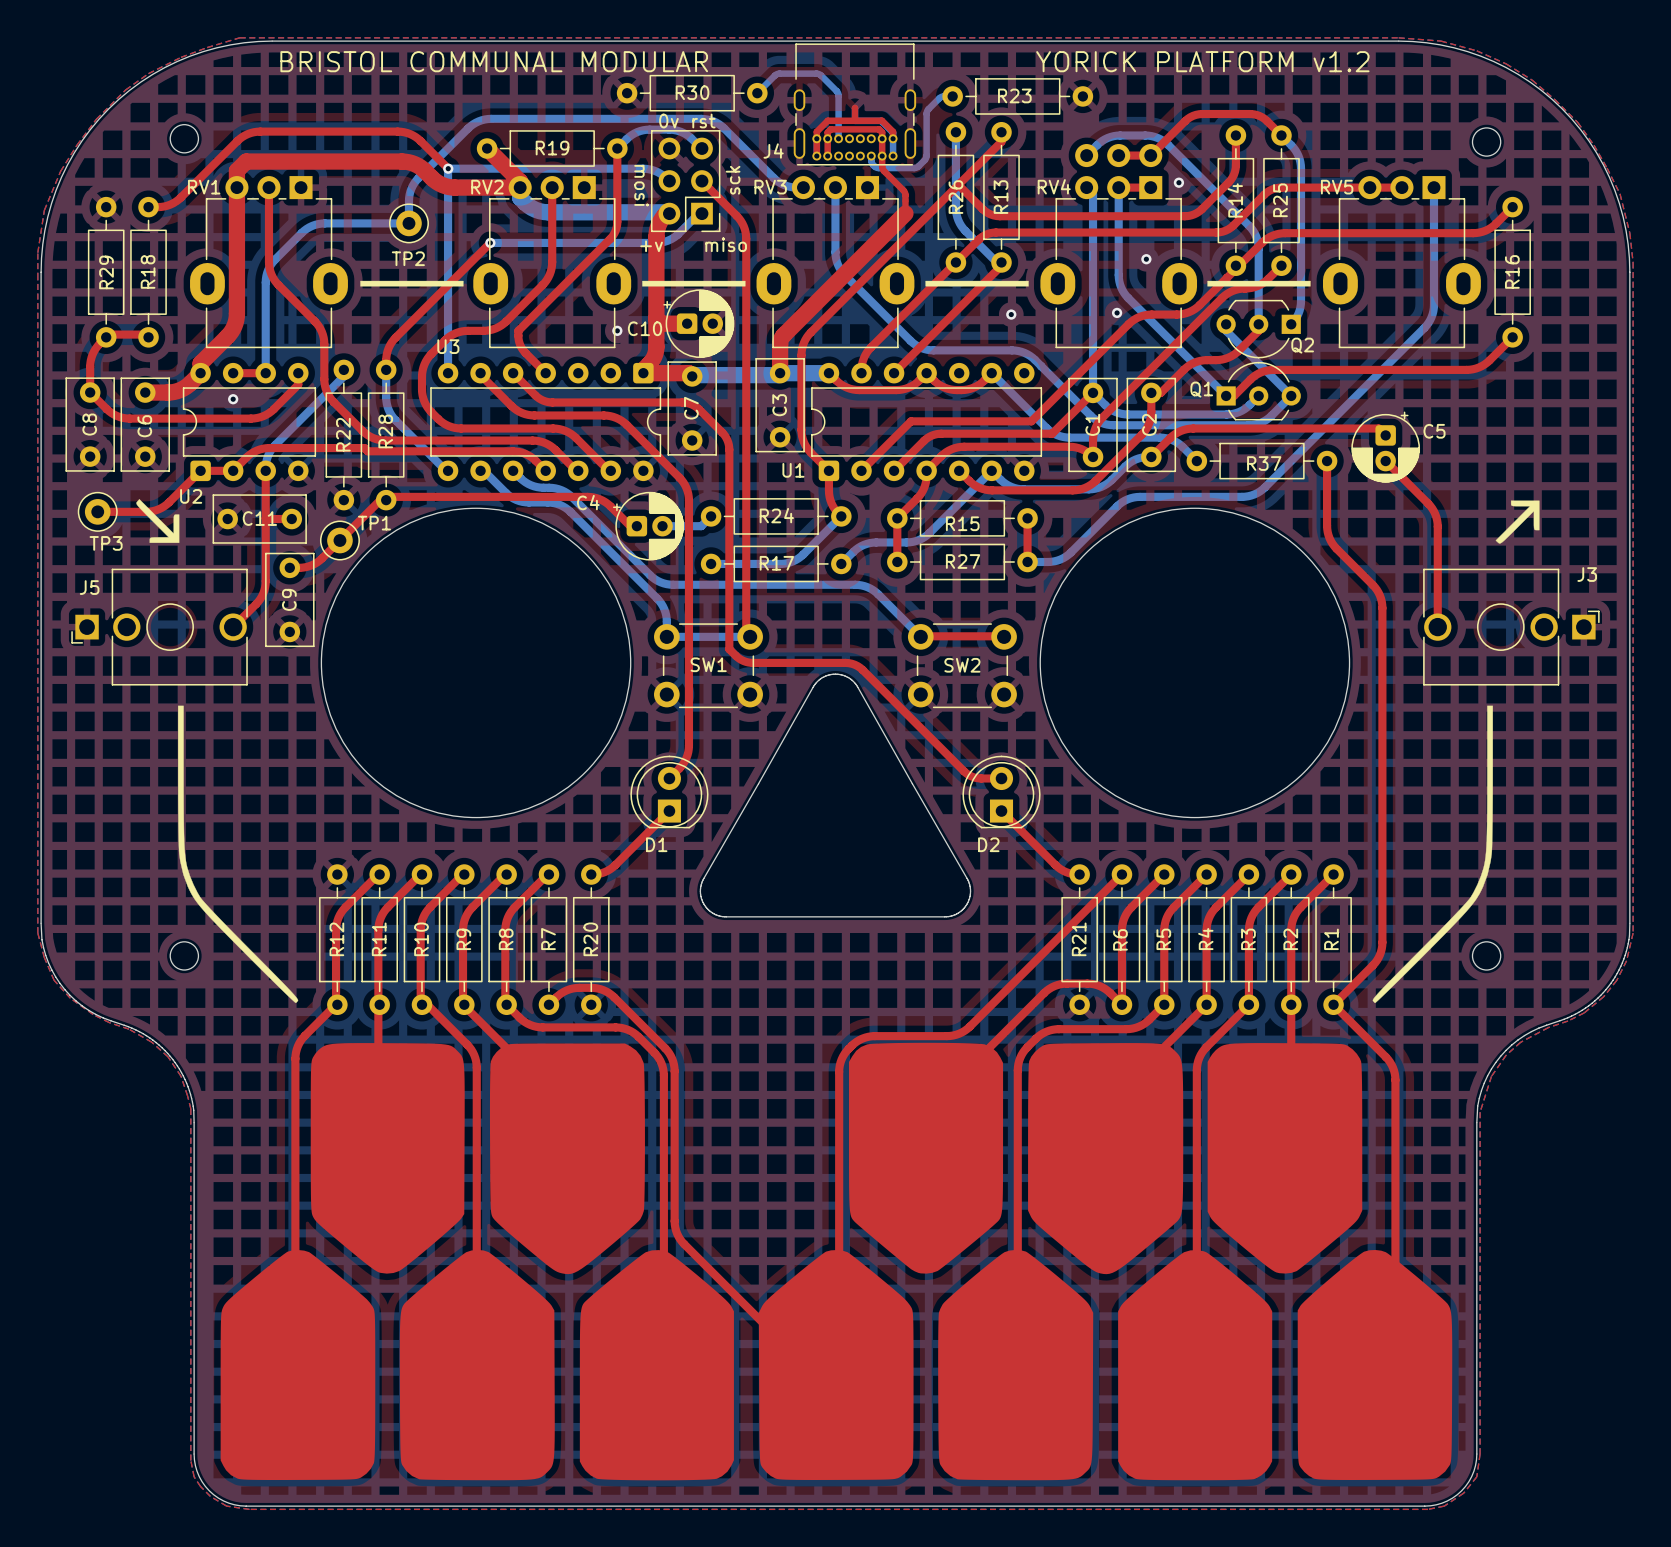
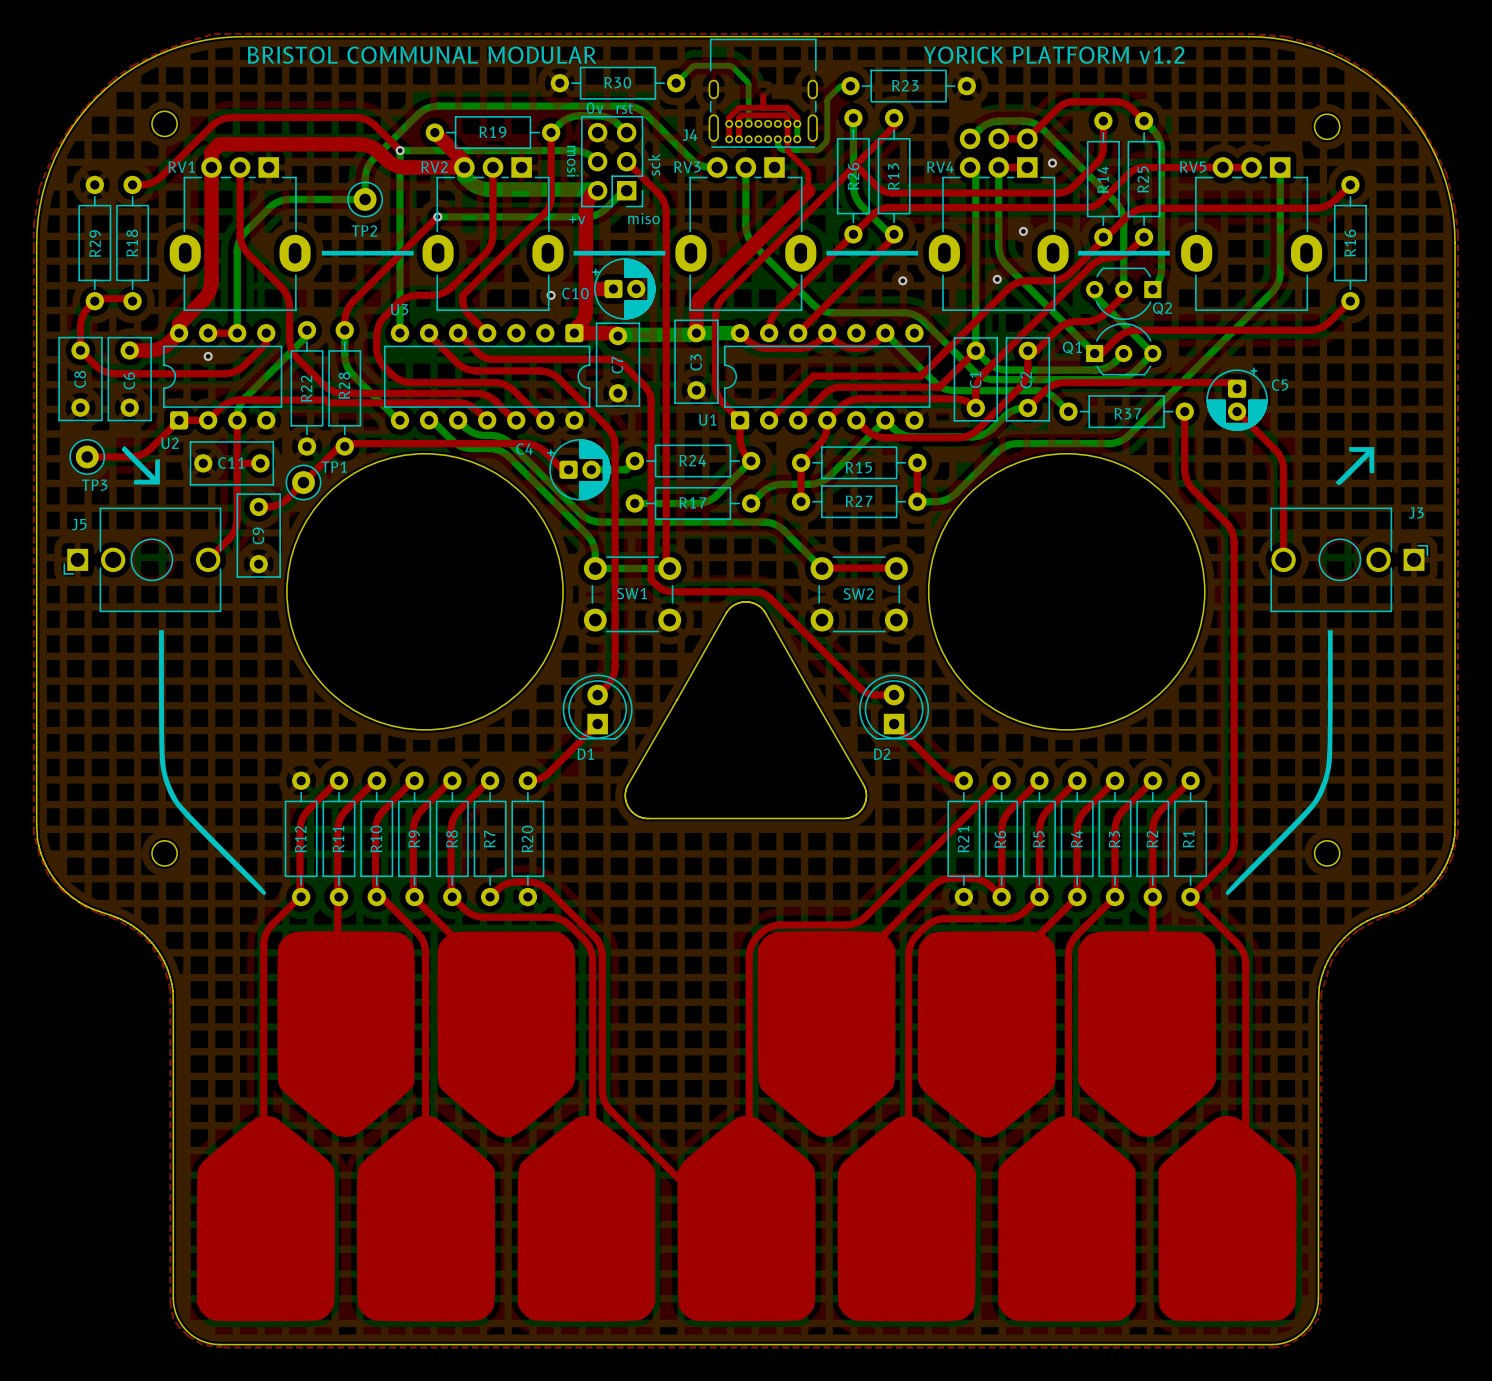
drawing: [360, 280, 464, 287] -> none
drawing: [642, 280, 746, 287] -> none
drawing: [925, 280, 1029, 287] -> none
drawing: [1207, 280, 1311, 287] -> none
drawing: none -> [121, 250, 1375, 896]
drawing: [136, 499, 180, 543] -> none
drawing: [1495, 500, 1540, 544] -> none
drawing: [177, 705, 299, 1004] -> none
drawing: [1372, 705, 1493, 1004] -> none

